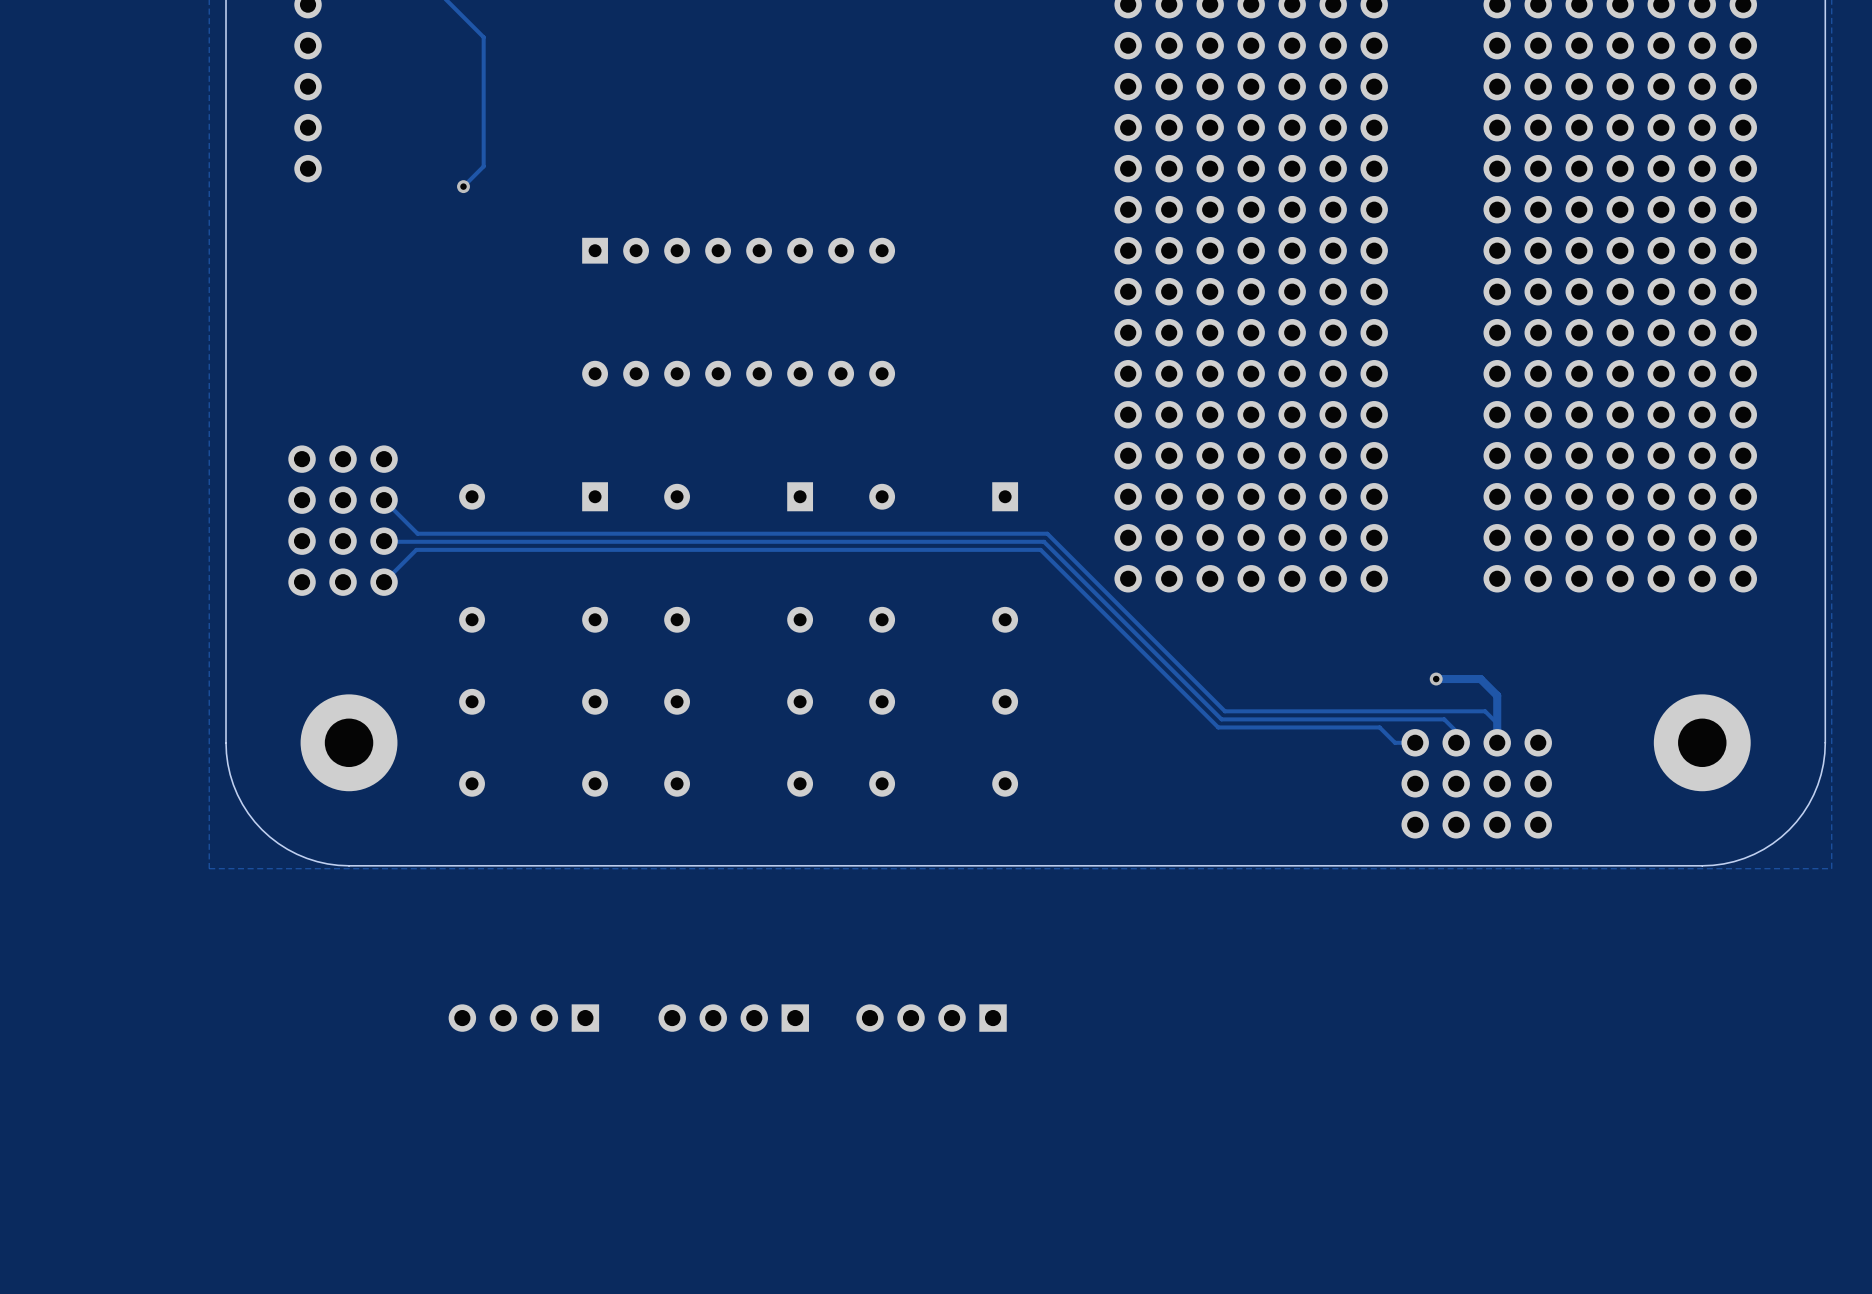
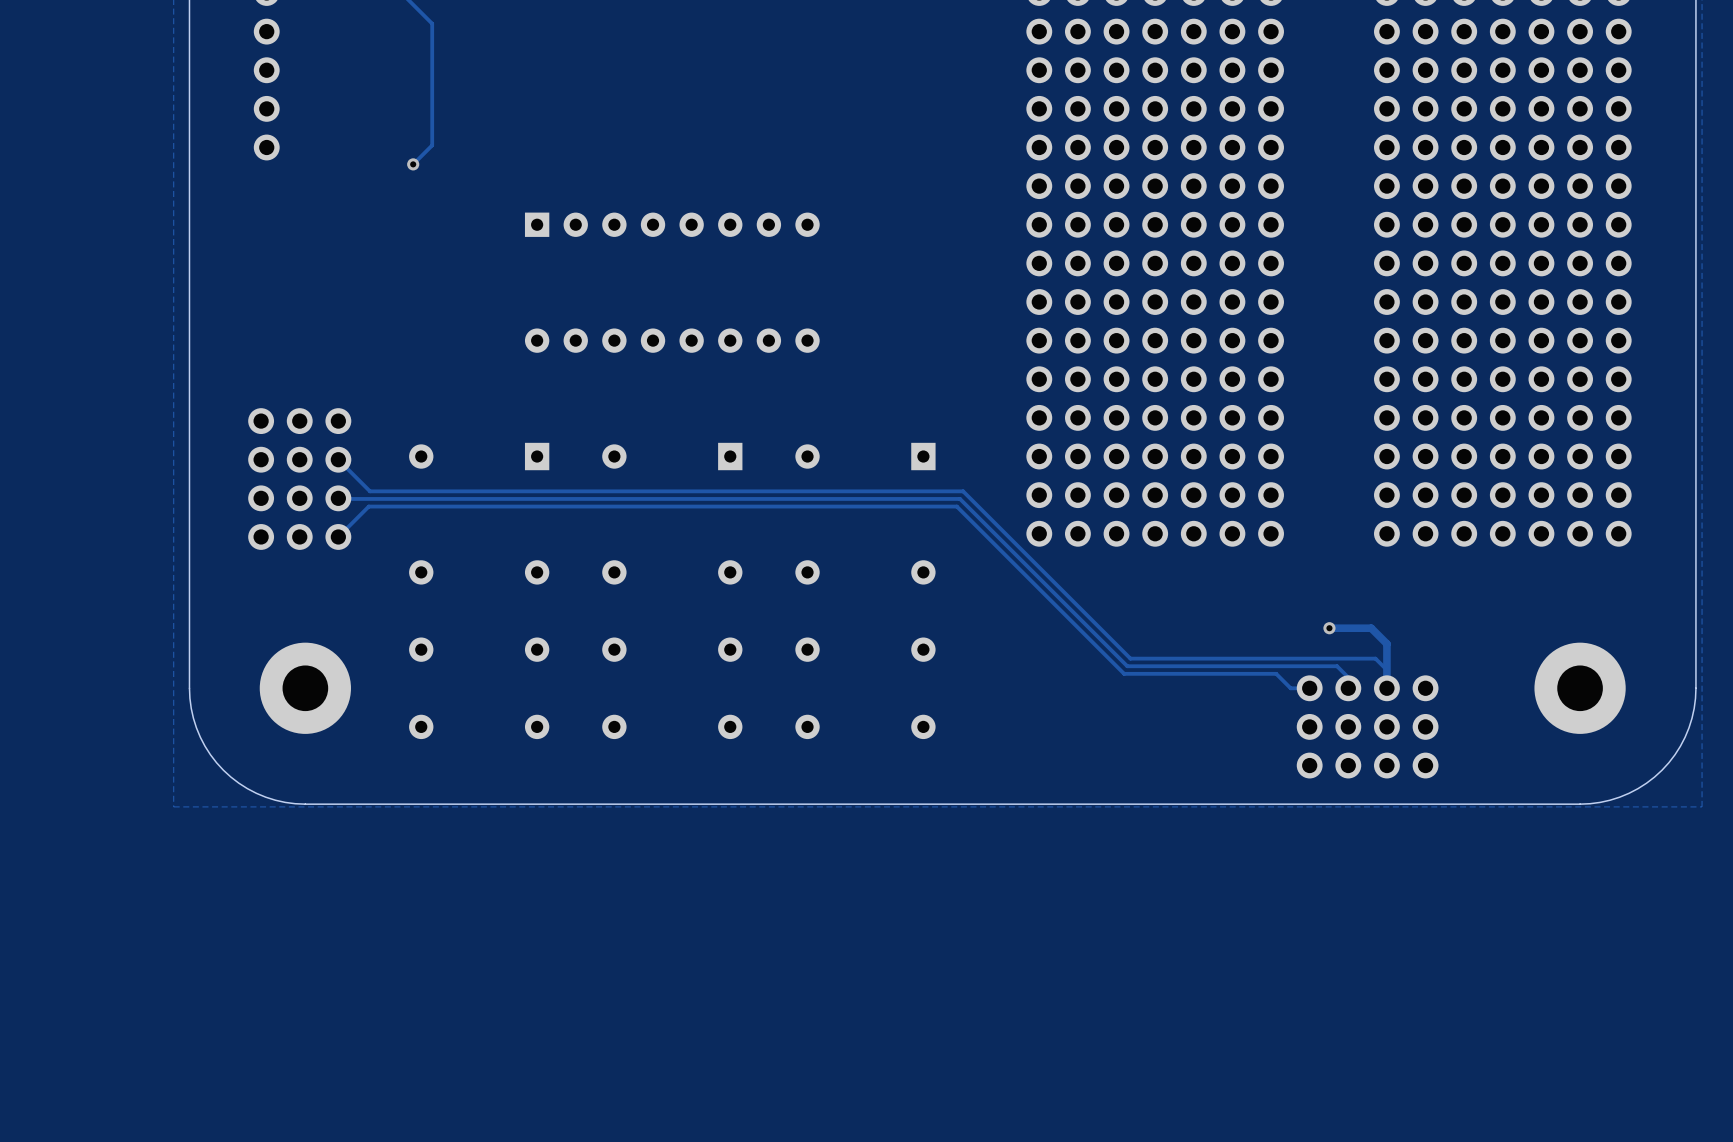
part: (523, 1018) -> none
part: (733, 1018) -> none
part: (931, 1018) -> none

